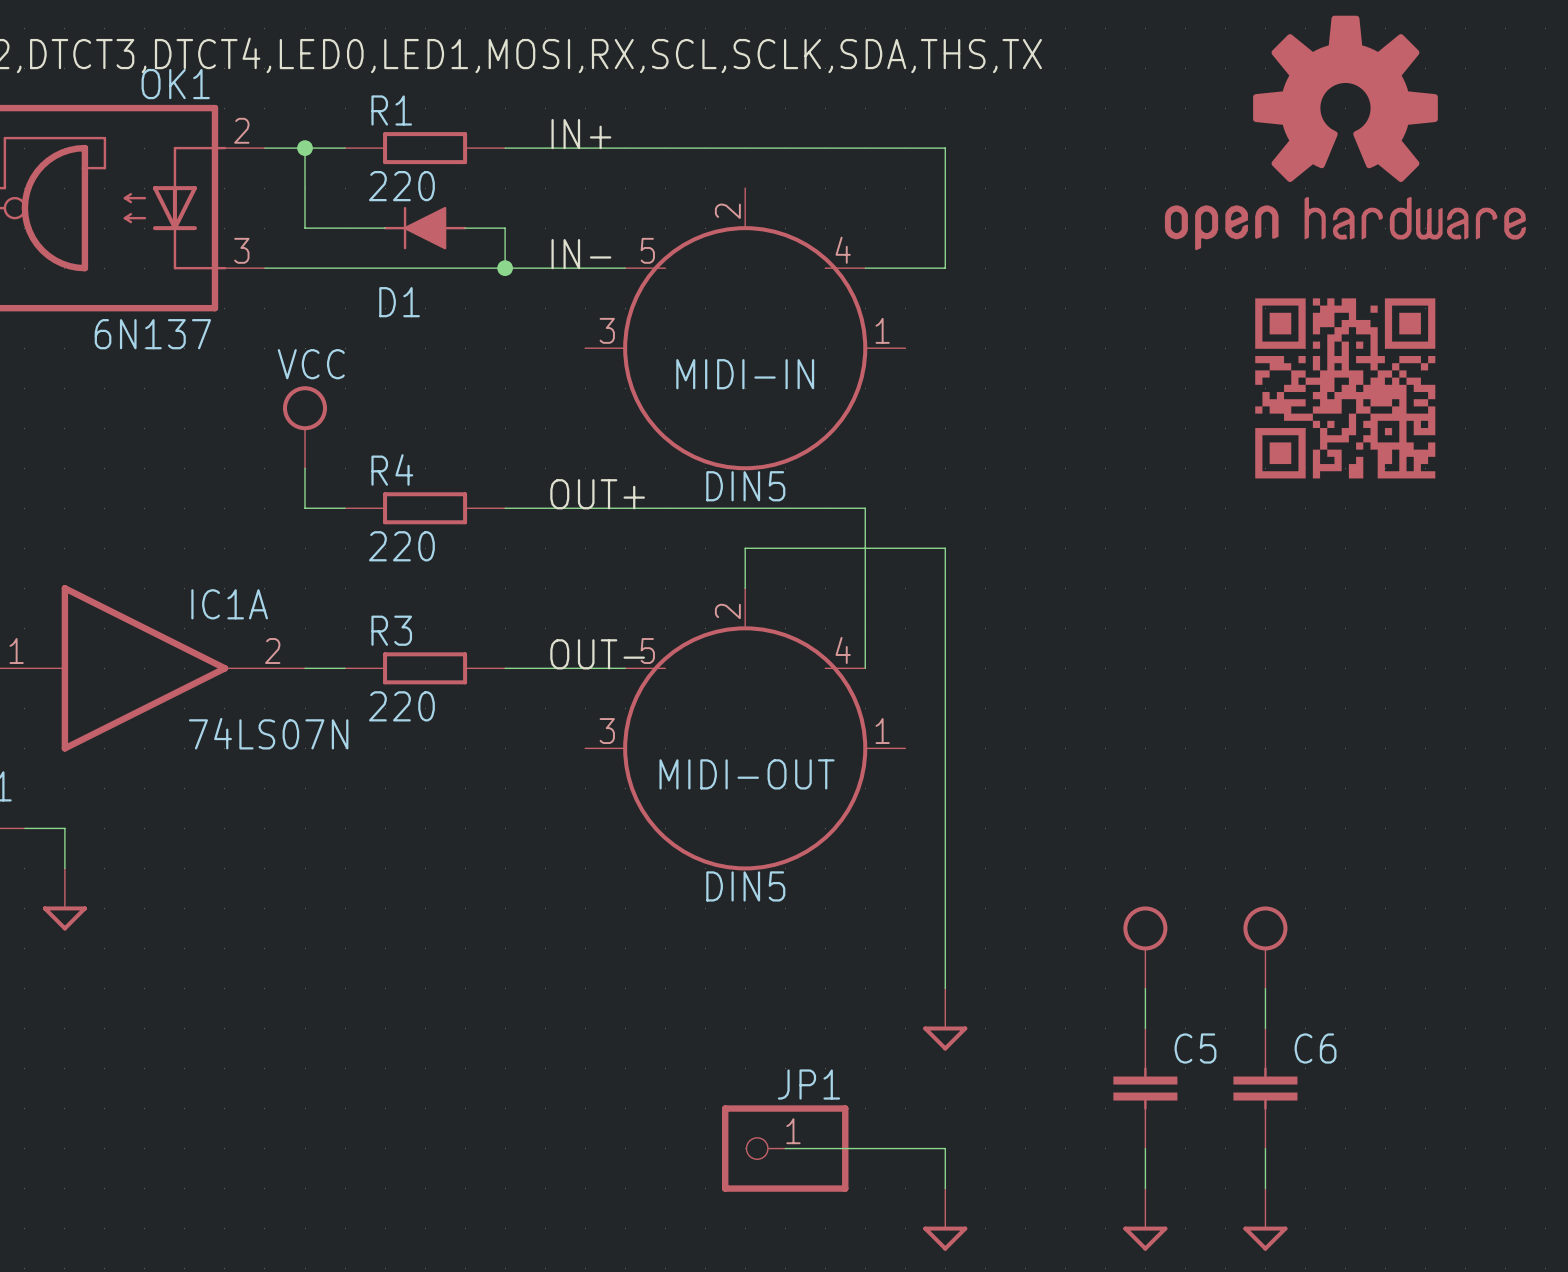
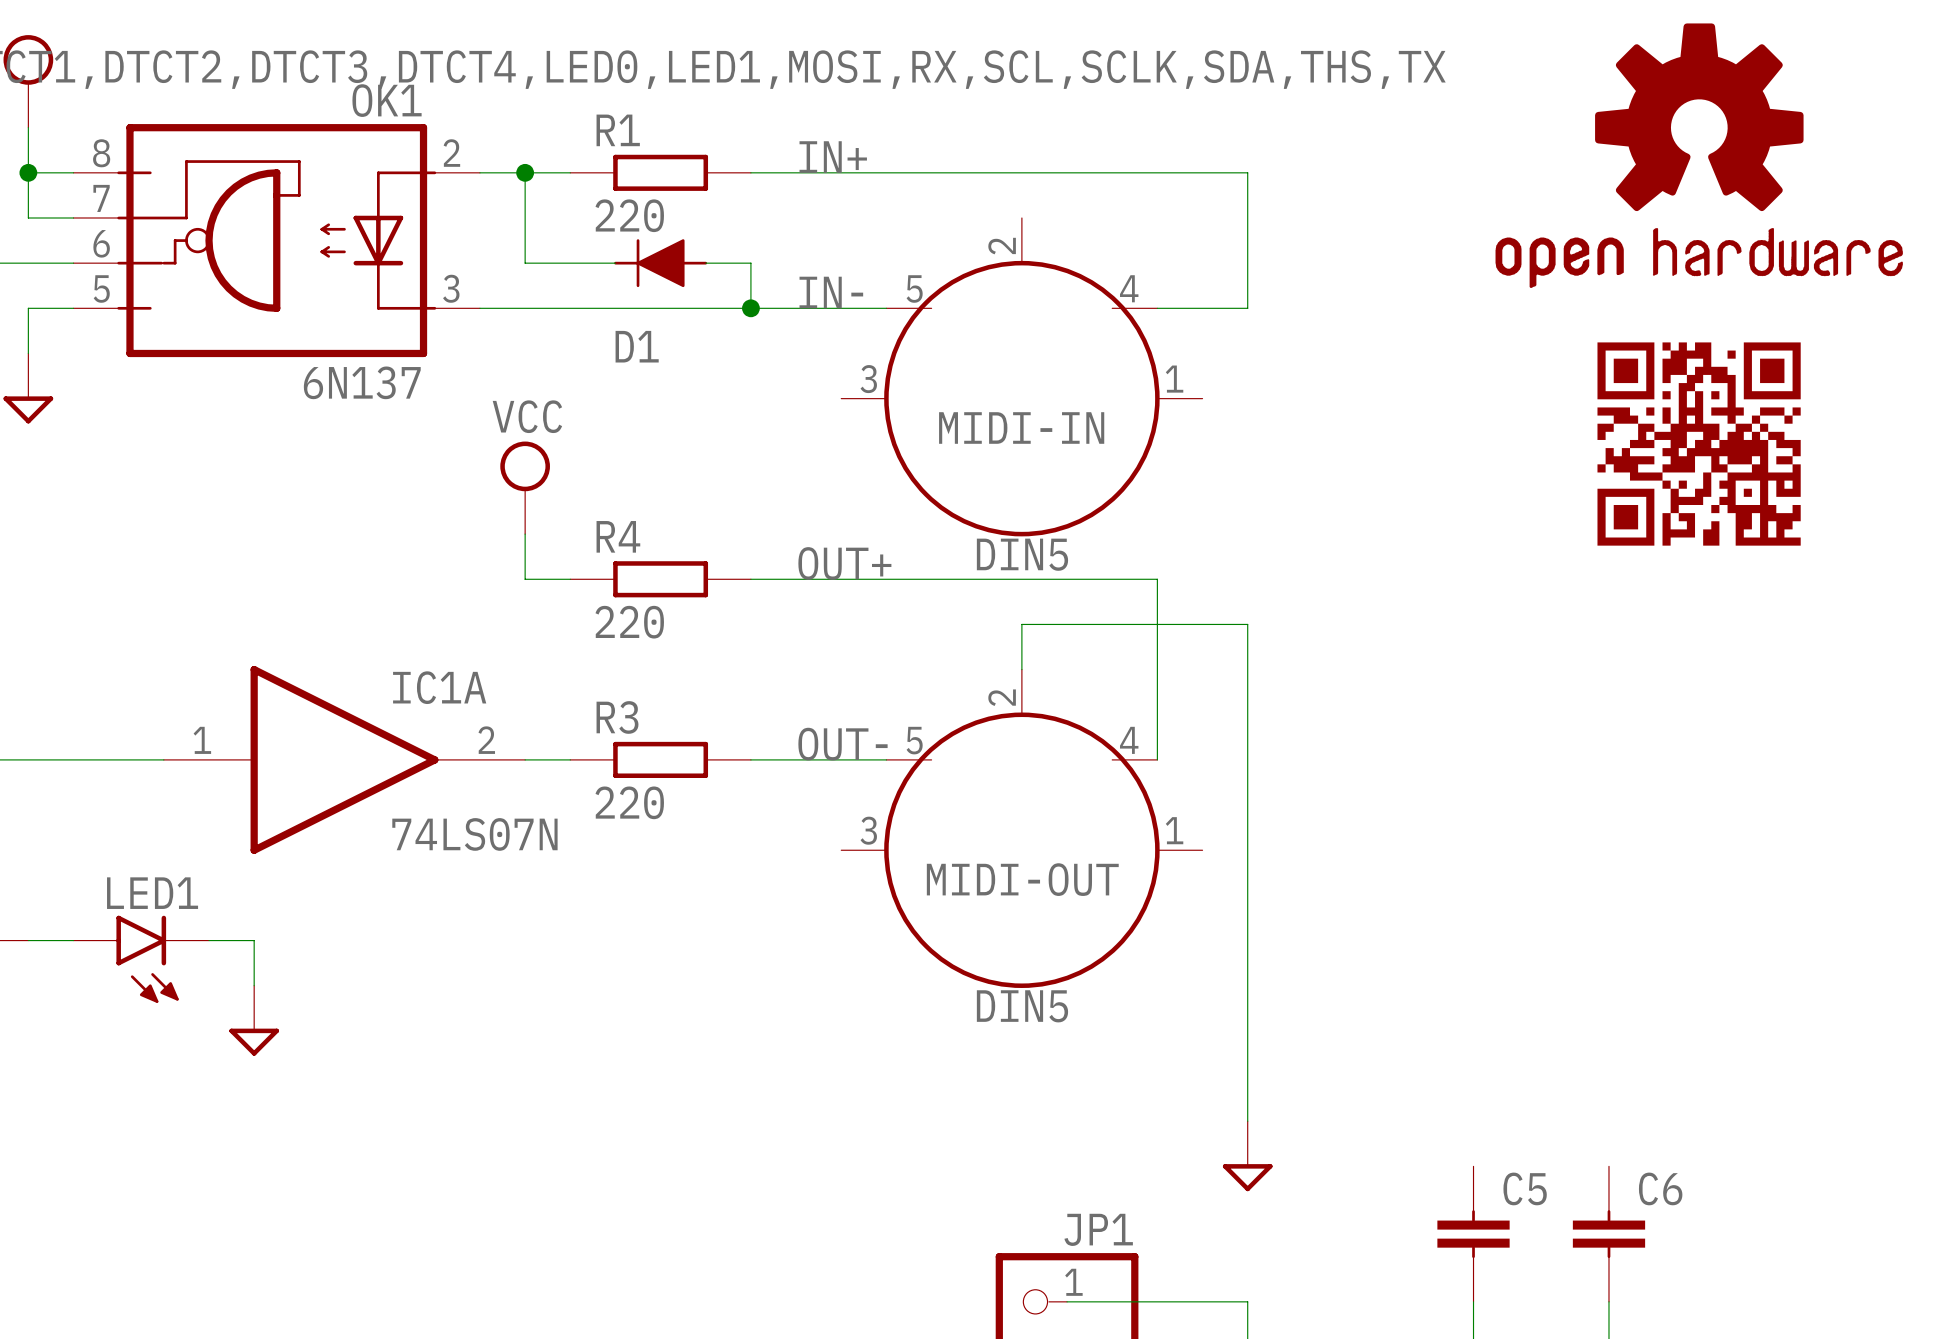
power symbol: (1145, 947) -> none
power symbol: (1265, 947) -> none
wire: (1145, 988) (1145, 1028) -> none
wire: (1265, 988) (1265, 1028) -> none

